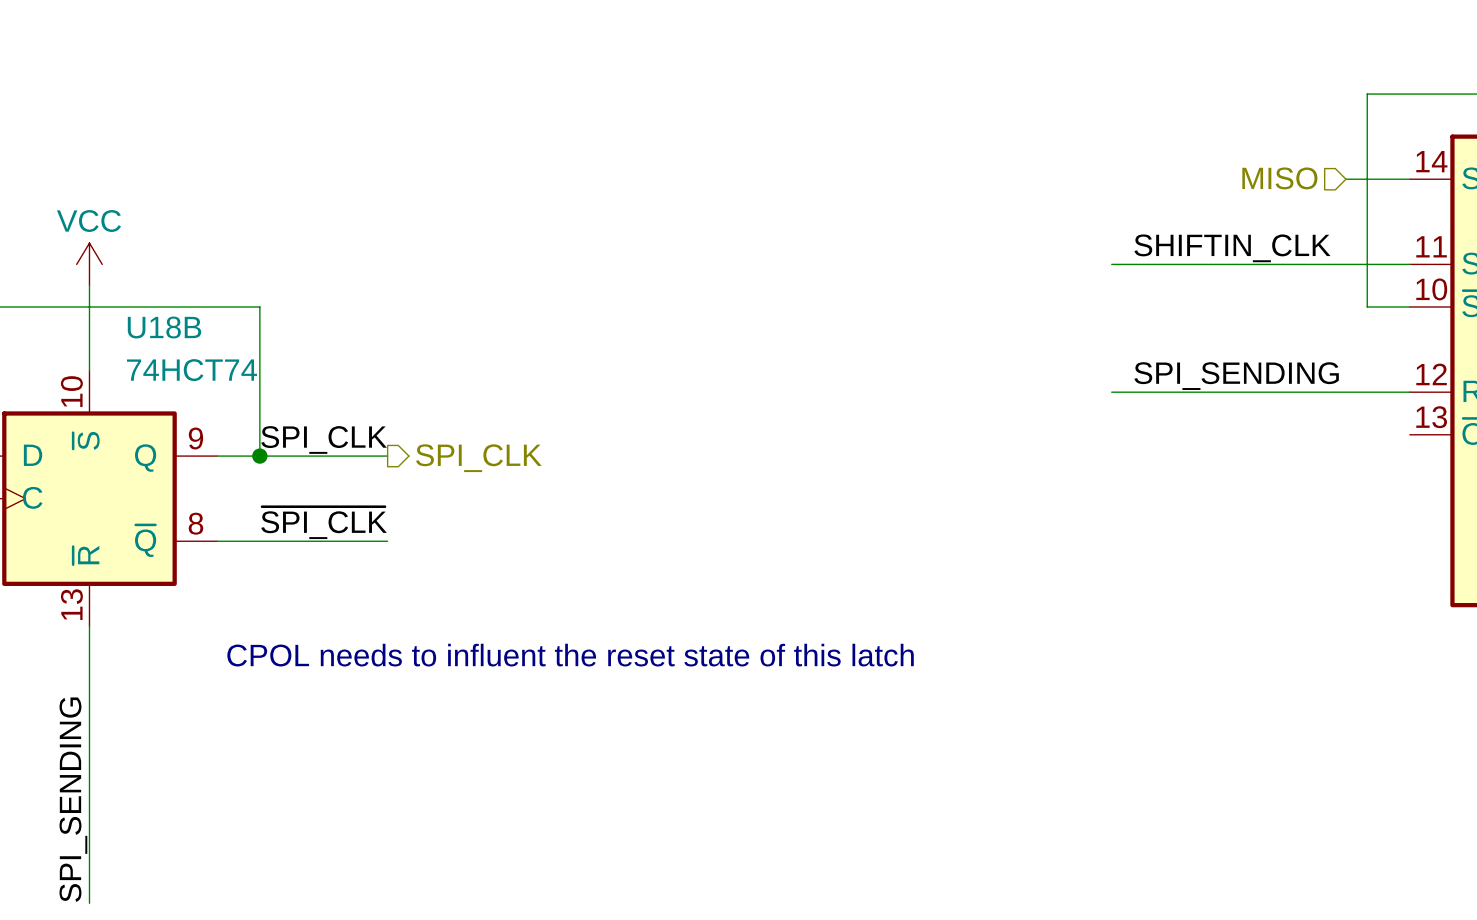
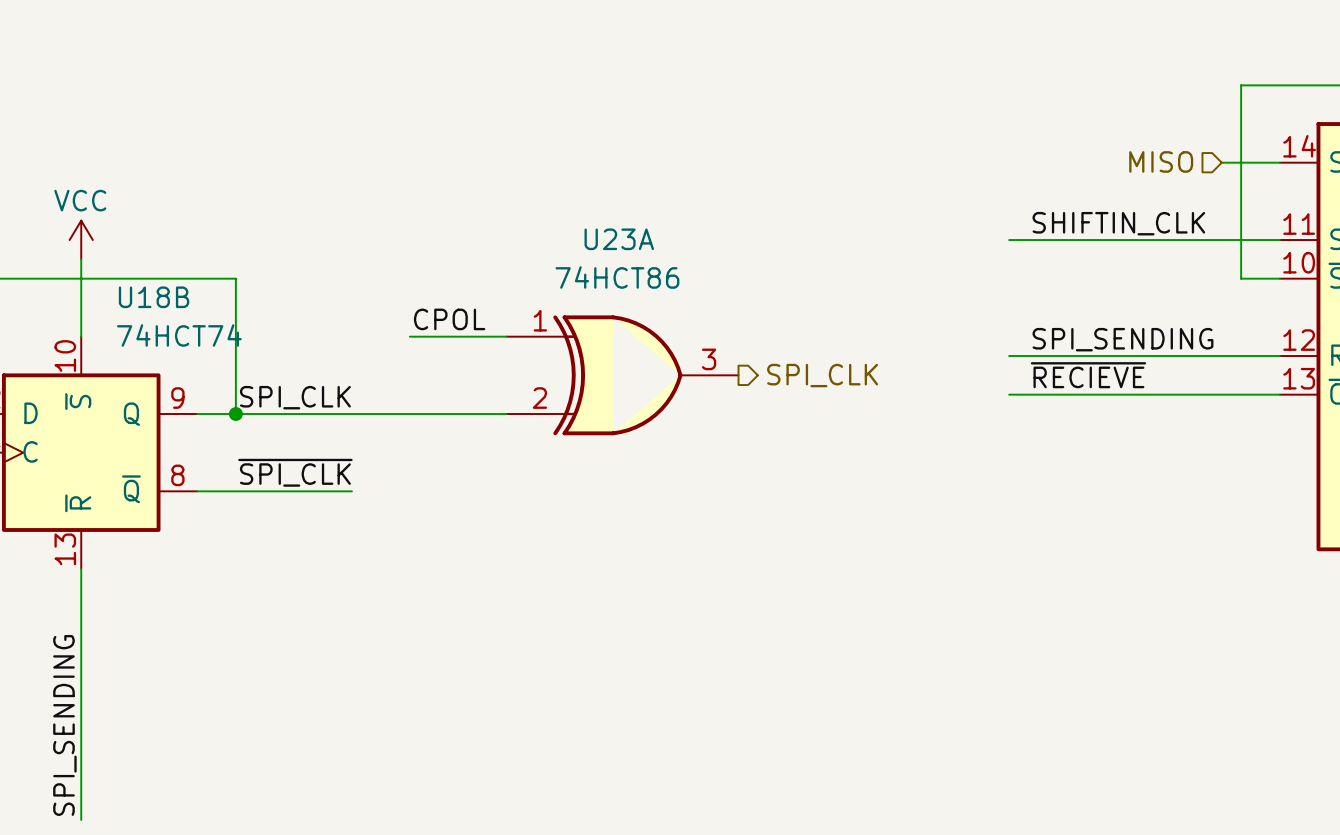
label: none -> CPOL (449, 319)
wire: none -> (409, 336) (506, 336)
U23A: none -> 74HCT86 (622, 375)
label: none -> ~{RECIEVE} (1088, 375)
hierarchical label: none -> SPI_CLK (822, 375)
wire: none -> (1009, 394) (1279, 394)
wire: none -> (351, 414) (506, 414)
hierarchical label: SPI_CLK (478, 458) -> none
text: CPOL needs to influent the reset state of this latch (570, 655) -> none

